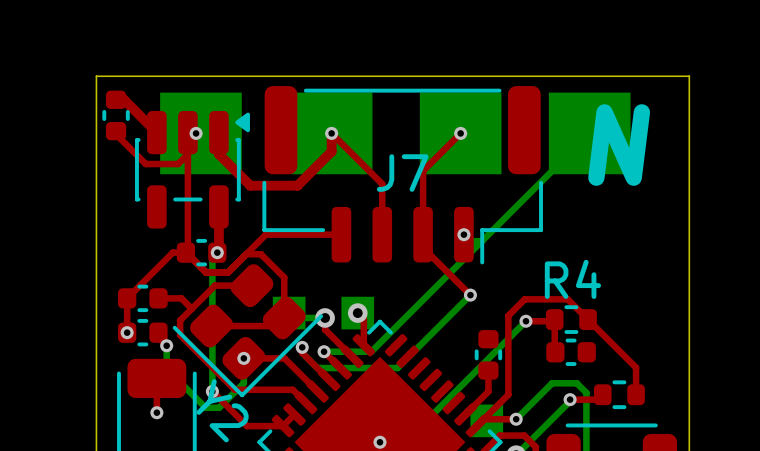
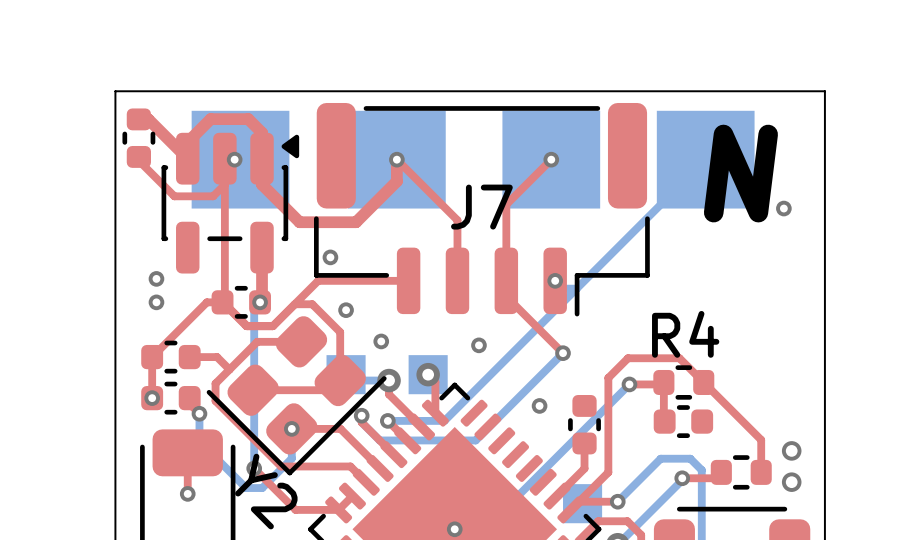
top track: none -> (187, 158) (187, 142) (210, 119) (248, 119) (262, 132) (262, 158)
via: none -> (783, 208)
via: none -> (330, 257)
via: none -> (156, 278)
via: none -> (156, 302)
via: none -> (346, 310)
via: none -> (381, 341)
via: none -> (478, 345)
via: none -> (539, 405)
via: none -> (791, 450)
via: none -> (791, 482)

